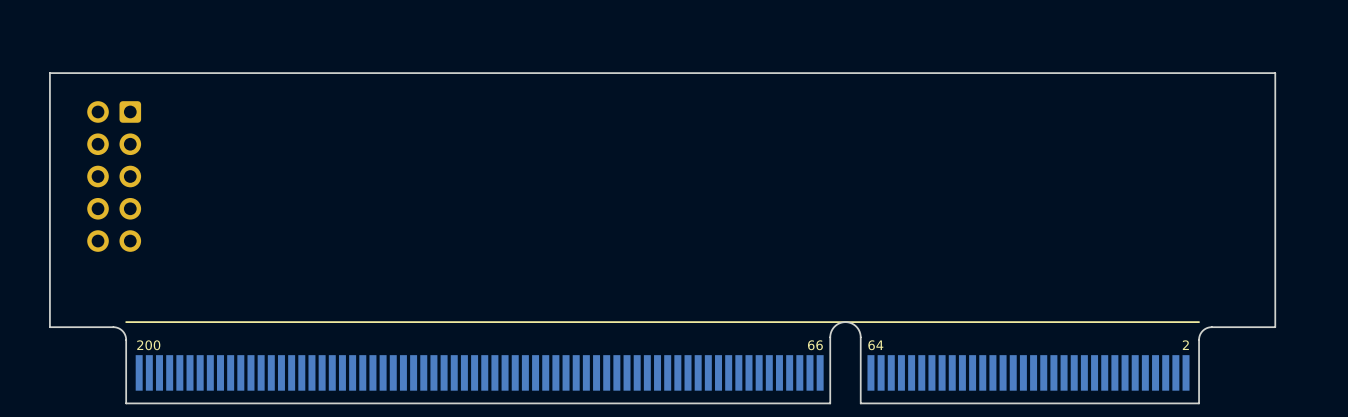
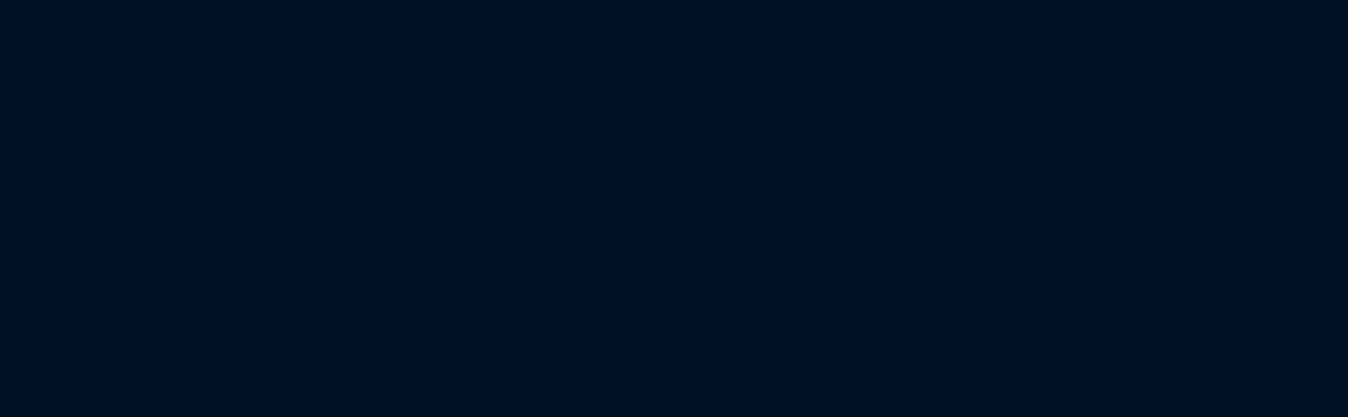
part: (114, 176) -> none
board edge: (1211, 327) (1275, 327) (1275, 73) (49, 73) (49, 327) (113, 327) -> none
part: (662, 362) -> none

